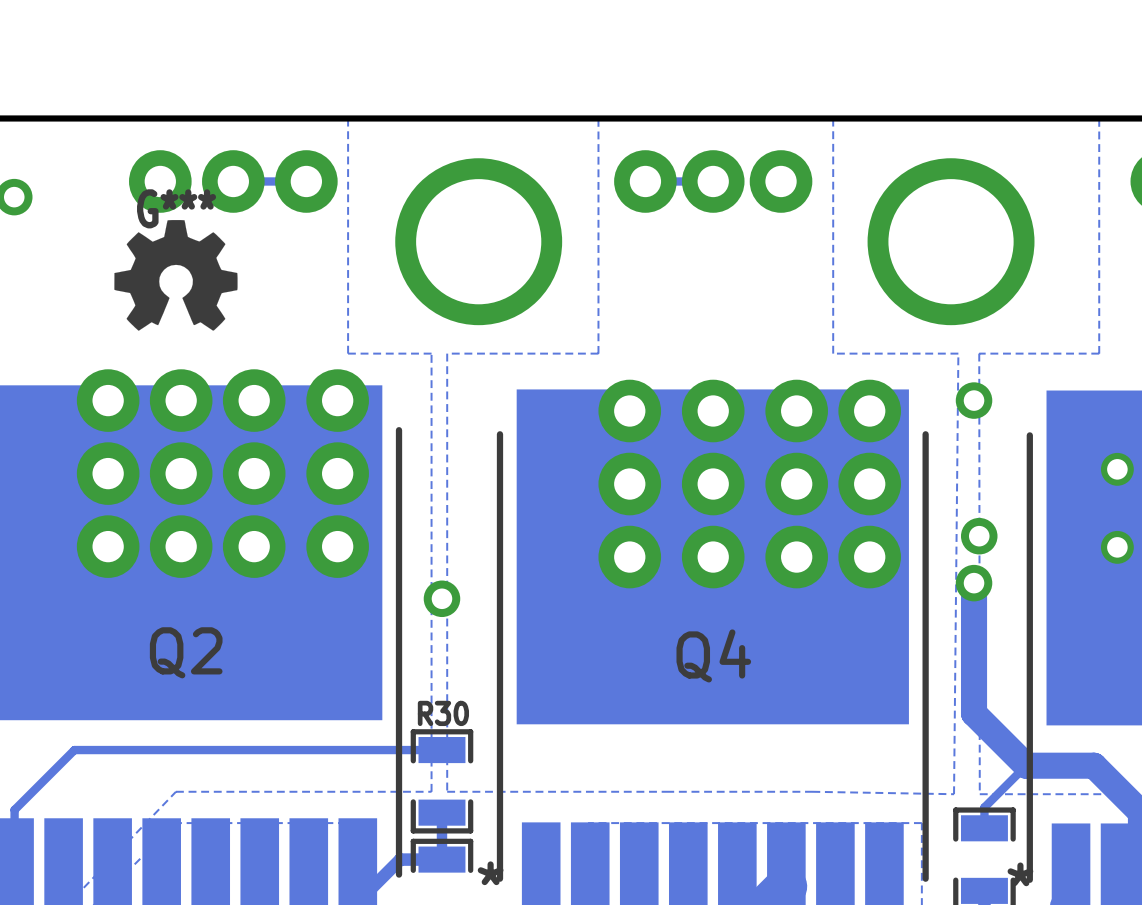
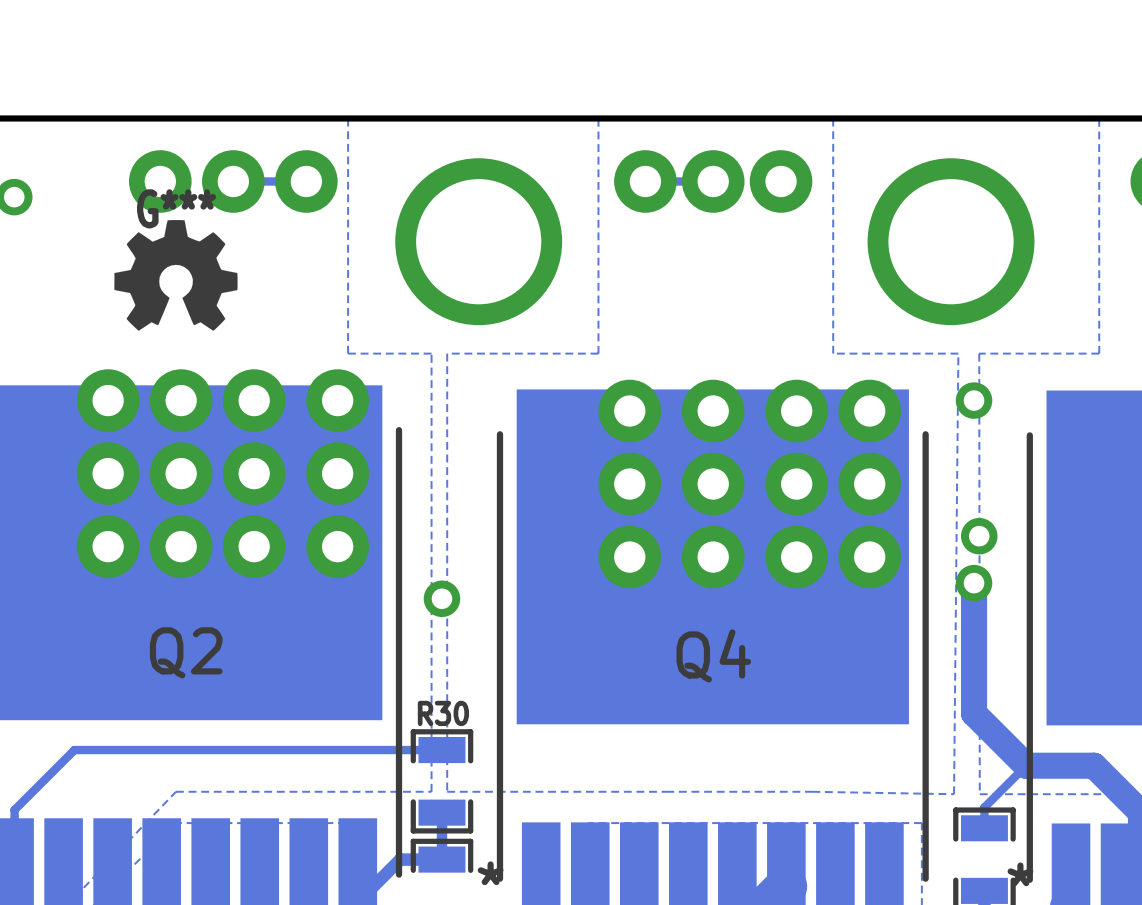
via: (1117, 469) -> none
via: (1117, 547) -> none

